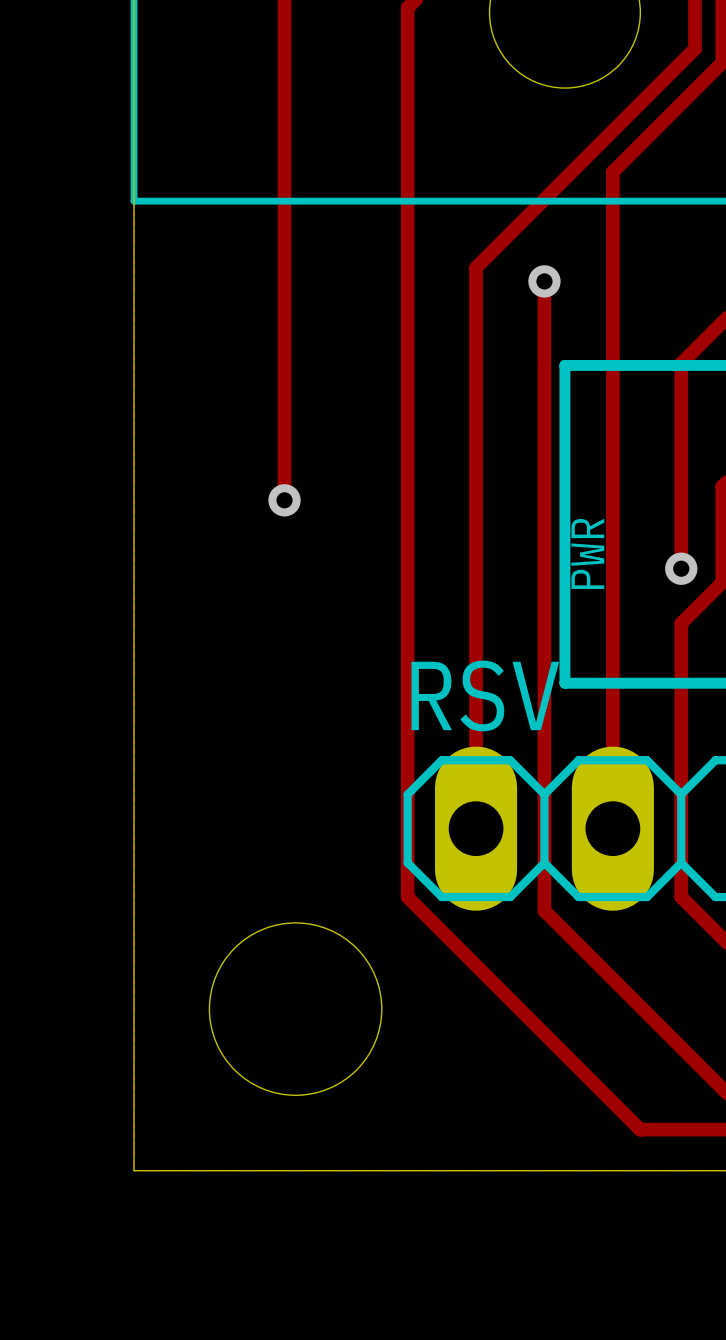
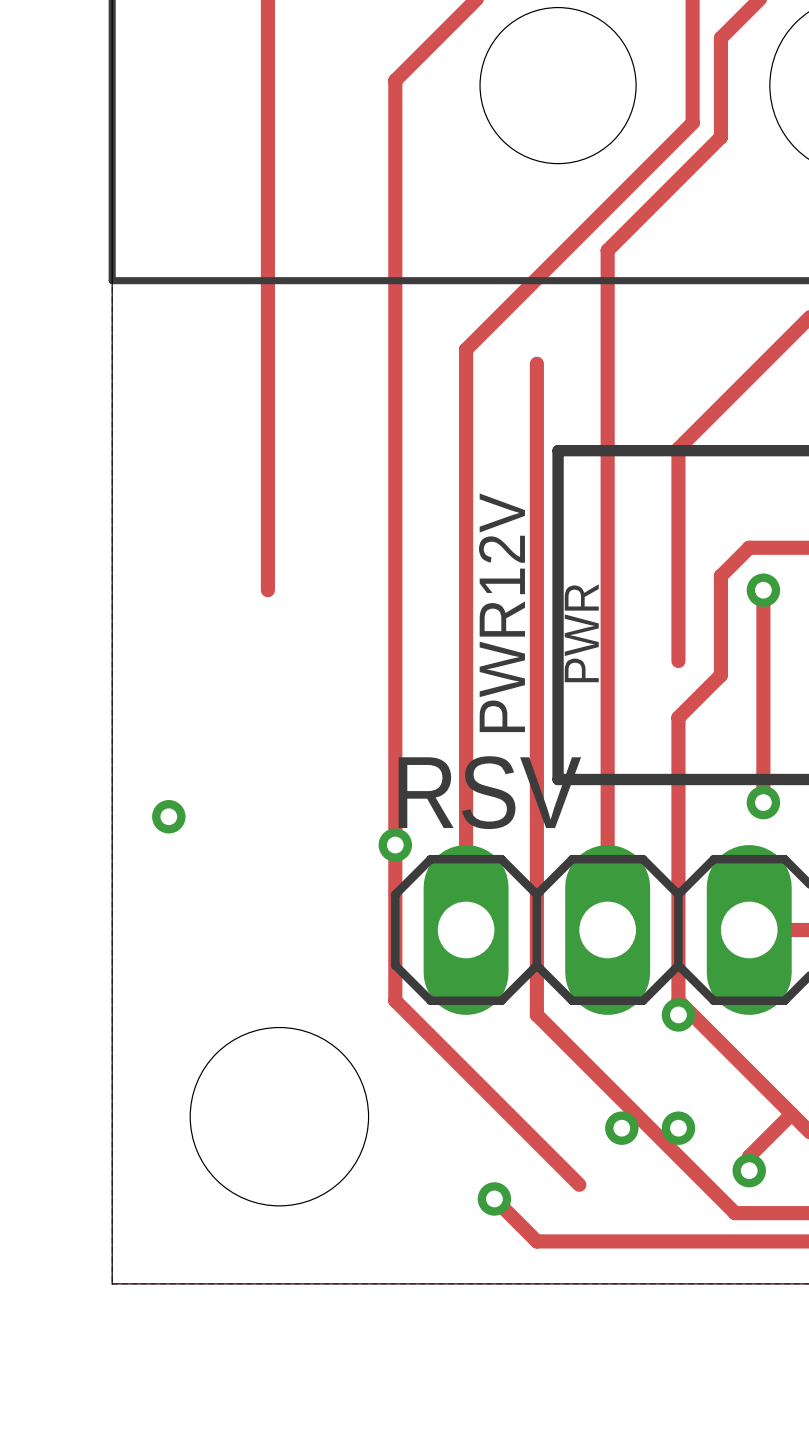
via: (544, 281) -> none
via: (284, 500) -> none
text: none -> PWR12V (501, 612)
via: (681, 568) -> none
via: none -> (168, 816)
via: none -> (395, 845)
via: none -> (678, 1014)
via: none -> (621, 1128)
via: none -> (678, 1128)
track: (585, 1074) (640, 1129) -> (494, 1198) (536, 1241) (635, 1241)
via: none -> (494, 1198)

